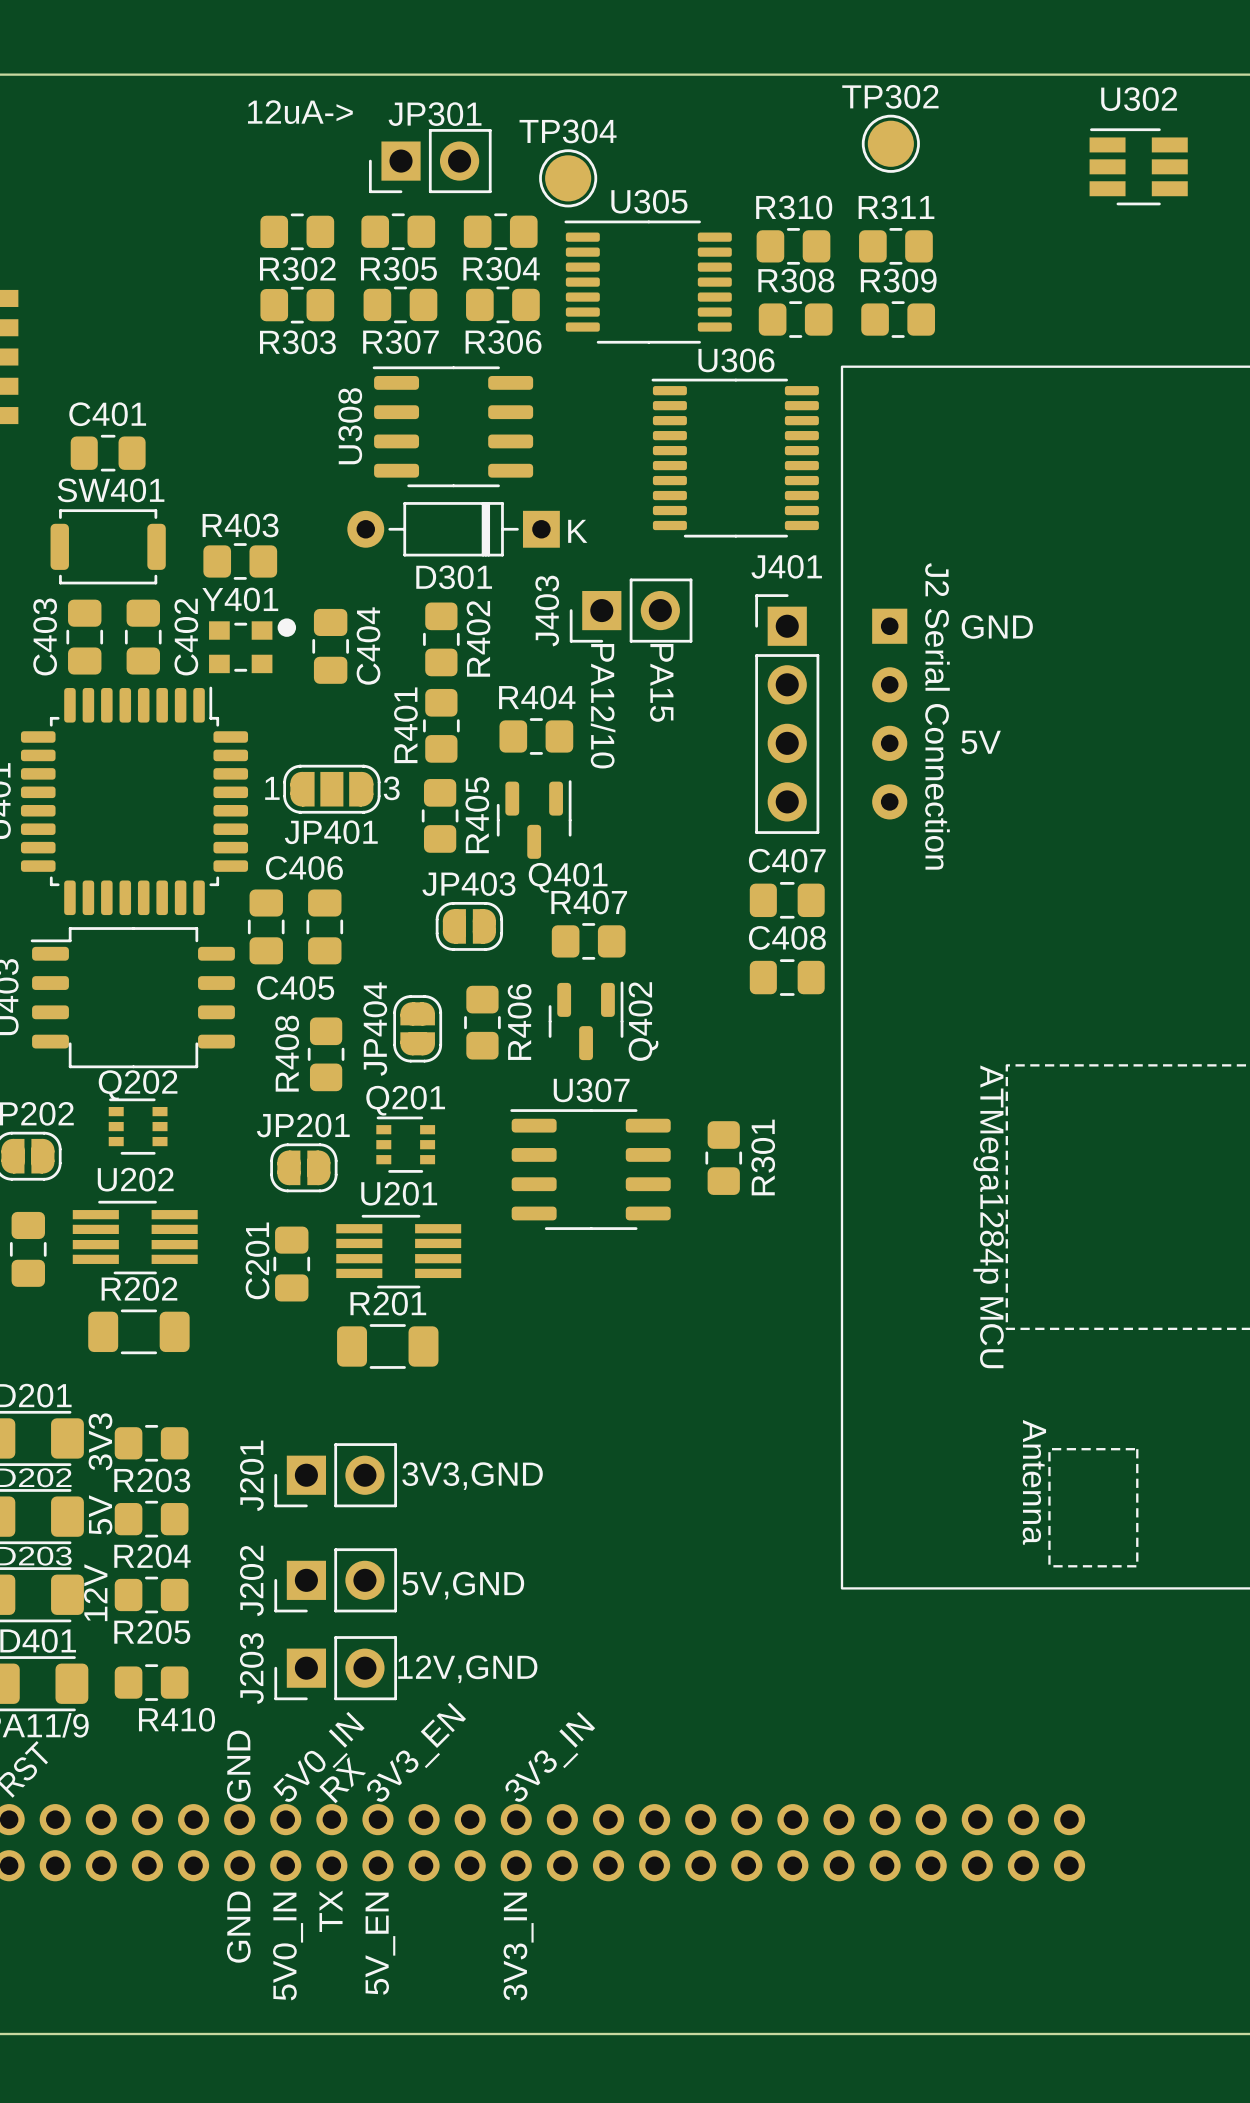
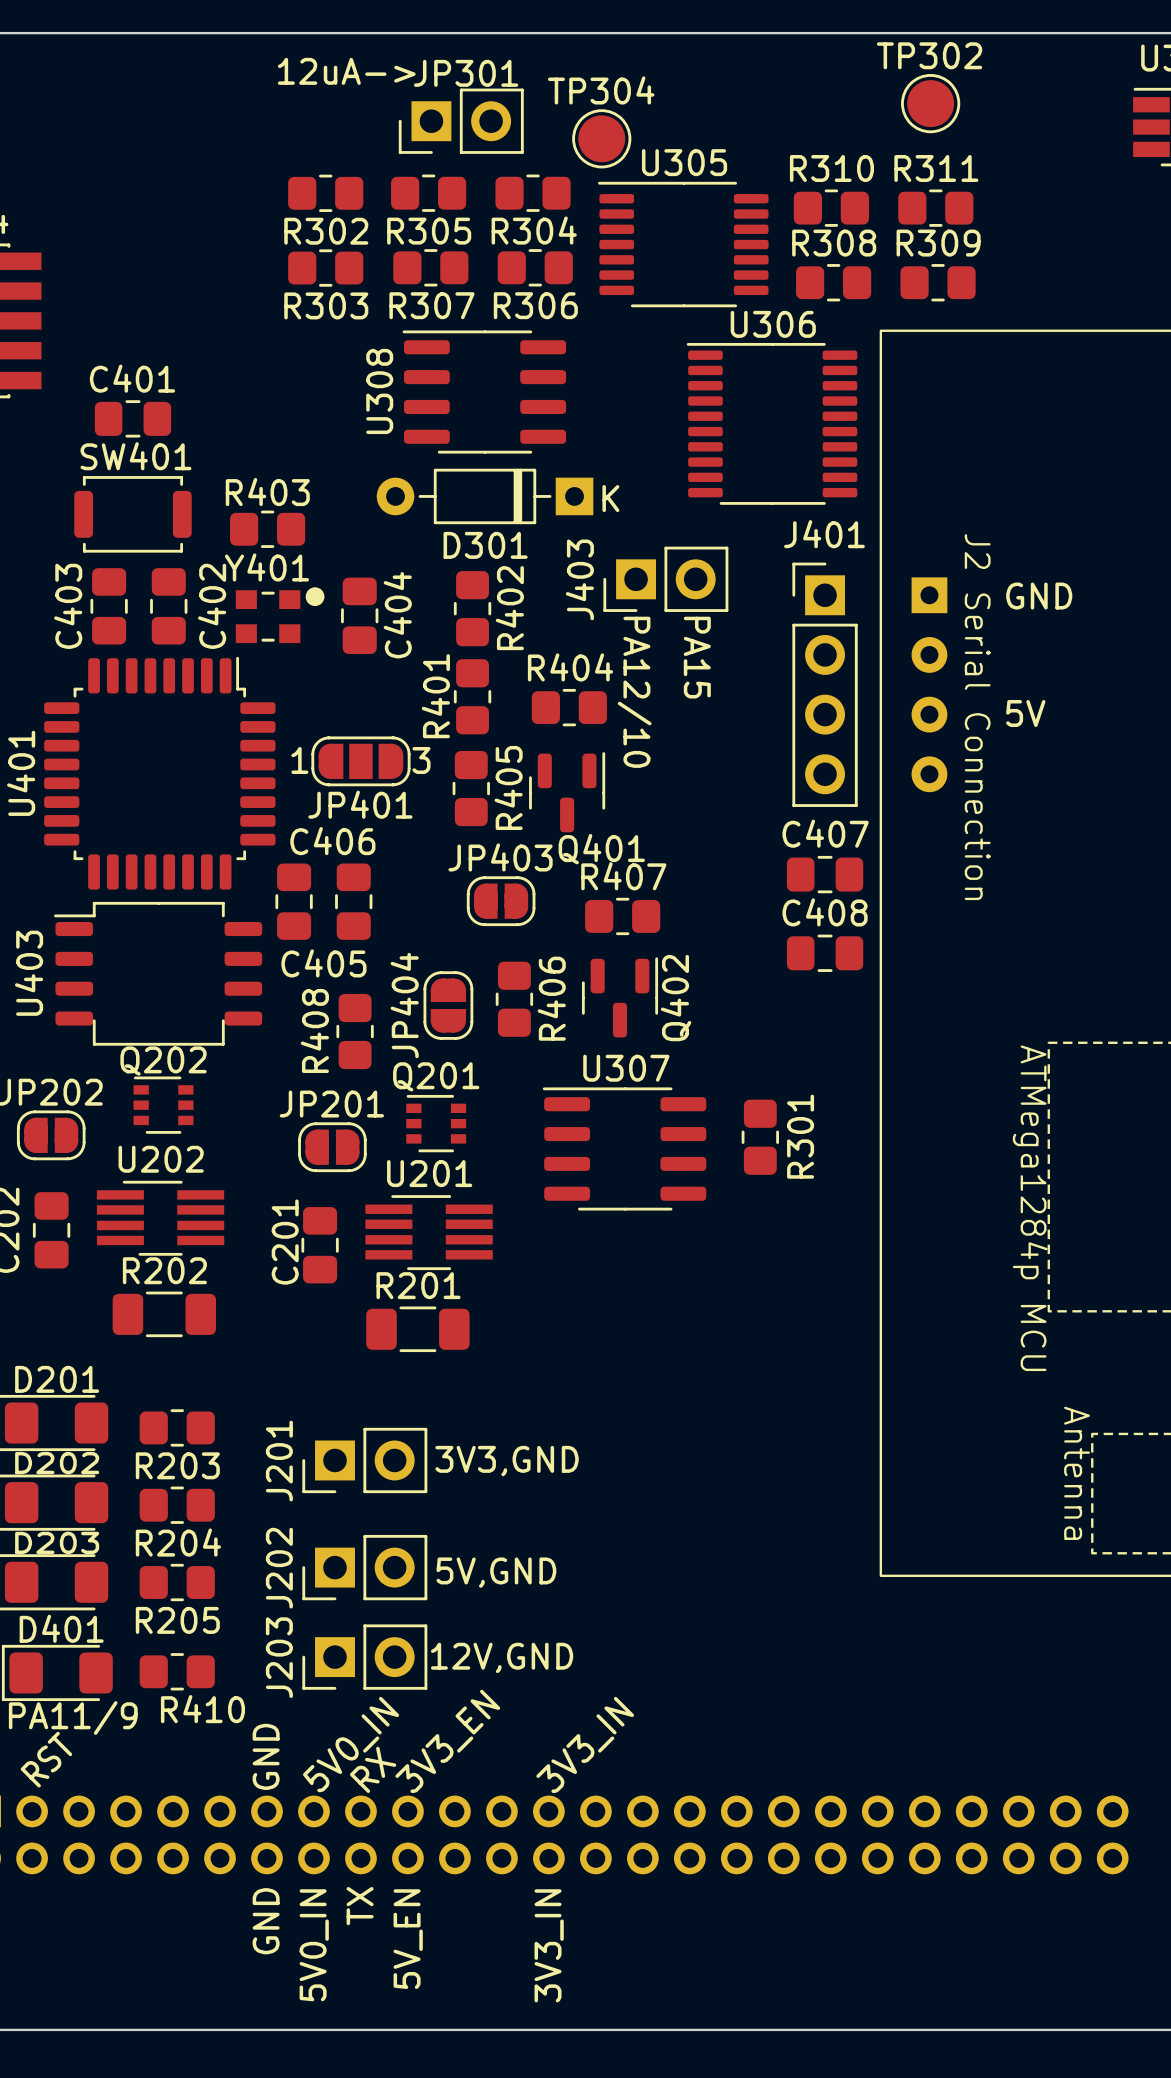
text: 3V3 (100, 1441) -> none
text: 5V (100, 1515) -> none
text: 12V (95, 1592) -> none

